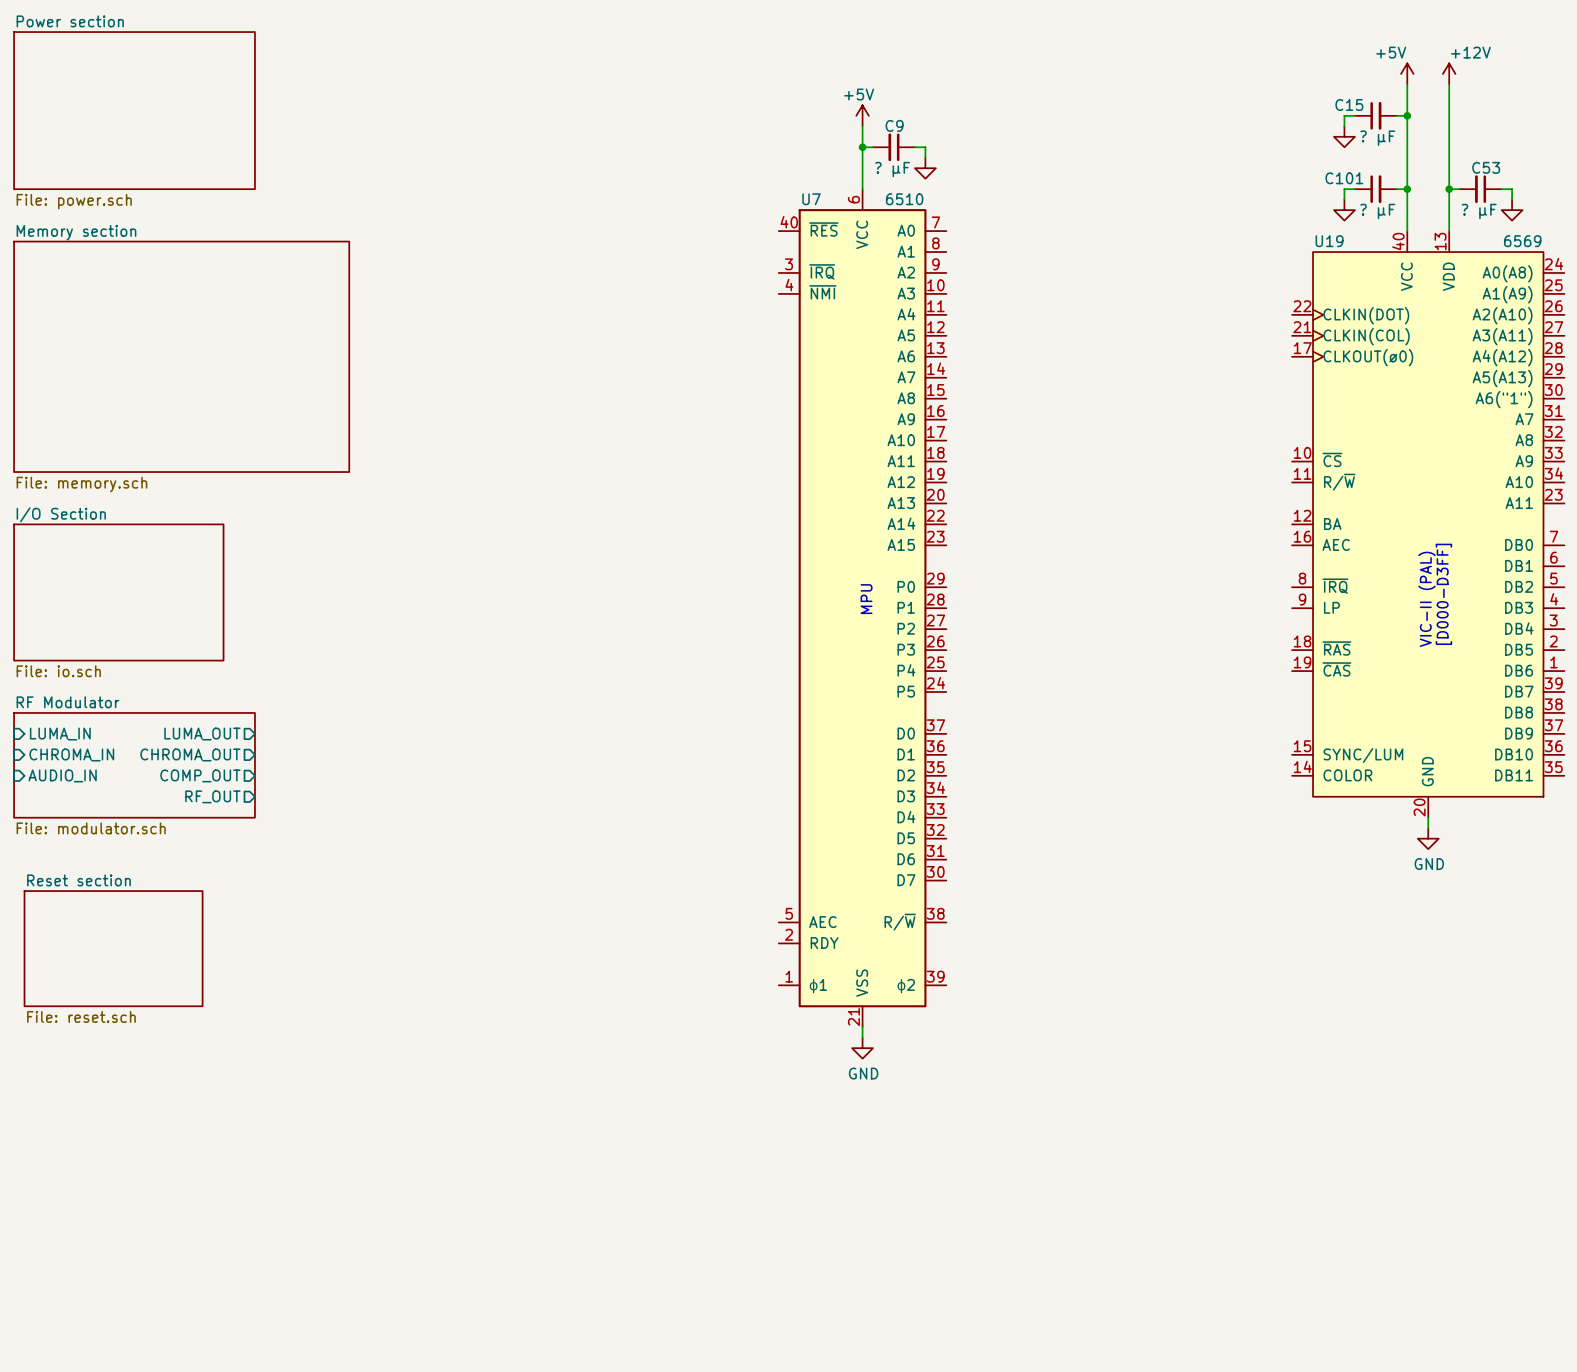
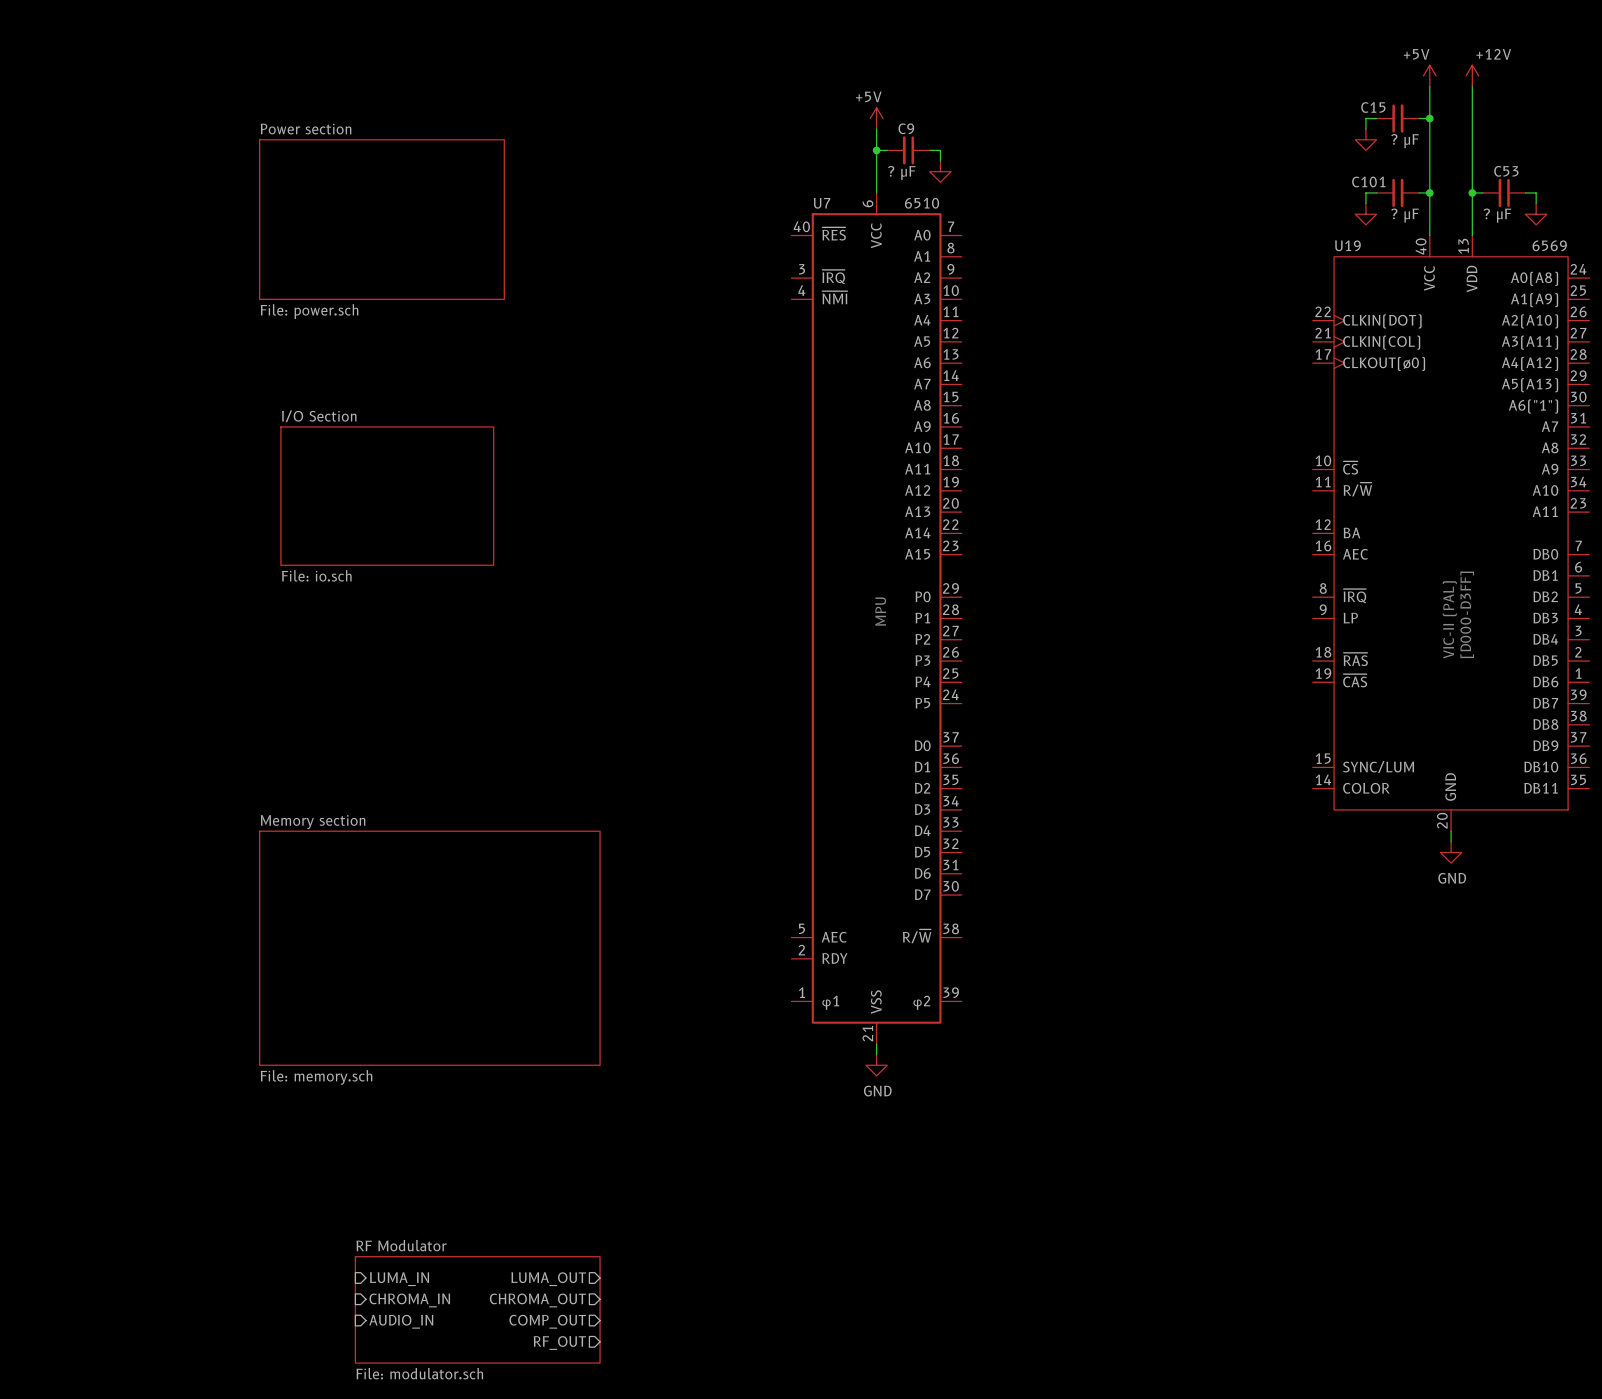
sheet Power section: File: power.sch (134, 110) -> none
sheet Power section: none -> File: power.sch (381, 219)
sheet Memory section: File: memory.sch (181, 356) -> none
sheet I/O Section: none -> File: io.sch (387, 496)
sheet I/O Section: File: io.sch (118, 592) -> none
sheet pin: LUMA_IN (60, 734) -> none
sheet pin: LUMA_OUT (202, 734) -> none
sheet pin: CHROMA_IN (71, 754) -> none
sheet pin: CHROMA_OUT (190, 754) -> none
sheet RF Modulator: File: modulator.sch (134, 765) -> none
sheet pin: AUDIO_IN (62, 775) -> none
sheet pin: COMP_OUT (200, 775) -> none
sheet pin: RF_OUT (212, 796) -> none
sheet Memory section: none -> File: memory.sch (429, 948)
sheet Reset section: File: reset.sch (113, 948) -> none
sheet pin: none -> LUMA_IN (399, 1279)
sheet pin: none -> LUMA_OUT (548, 1279)
sheet pin: none -> CHROMA_IN (409, 1300)
sheet pin: none -> CHROMA_OUT (537, 1300)
sheet RF Modulator: none -> File: modulator.sch (477, 1309)
sheet pin: none -> AUDIO_IN (401, 1321)
sheet pin: none -> COMP_OUT (547, 1321)
sheet pin: none -> RF_OUT (559, 1343)

